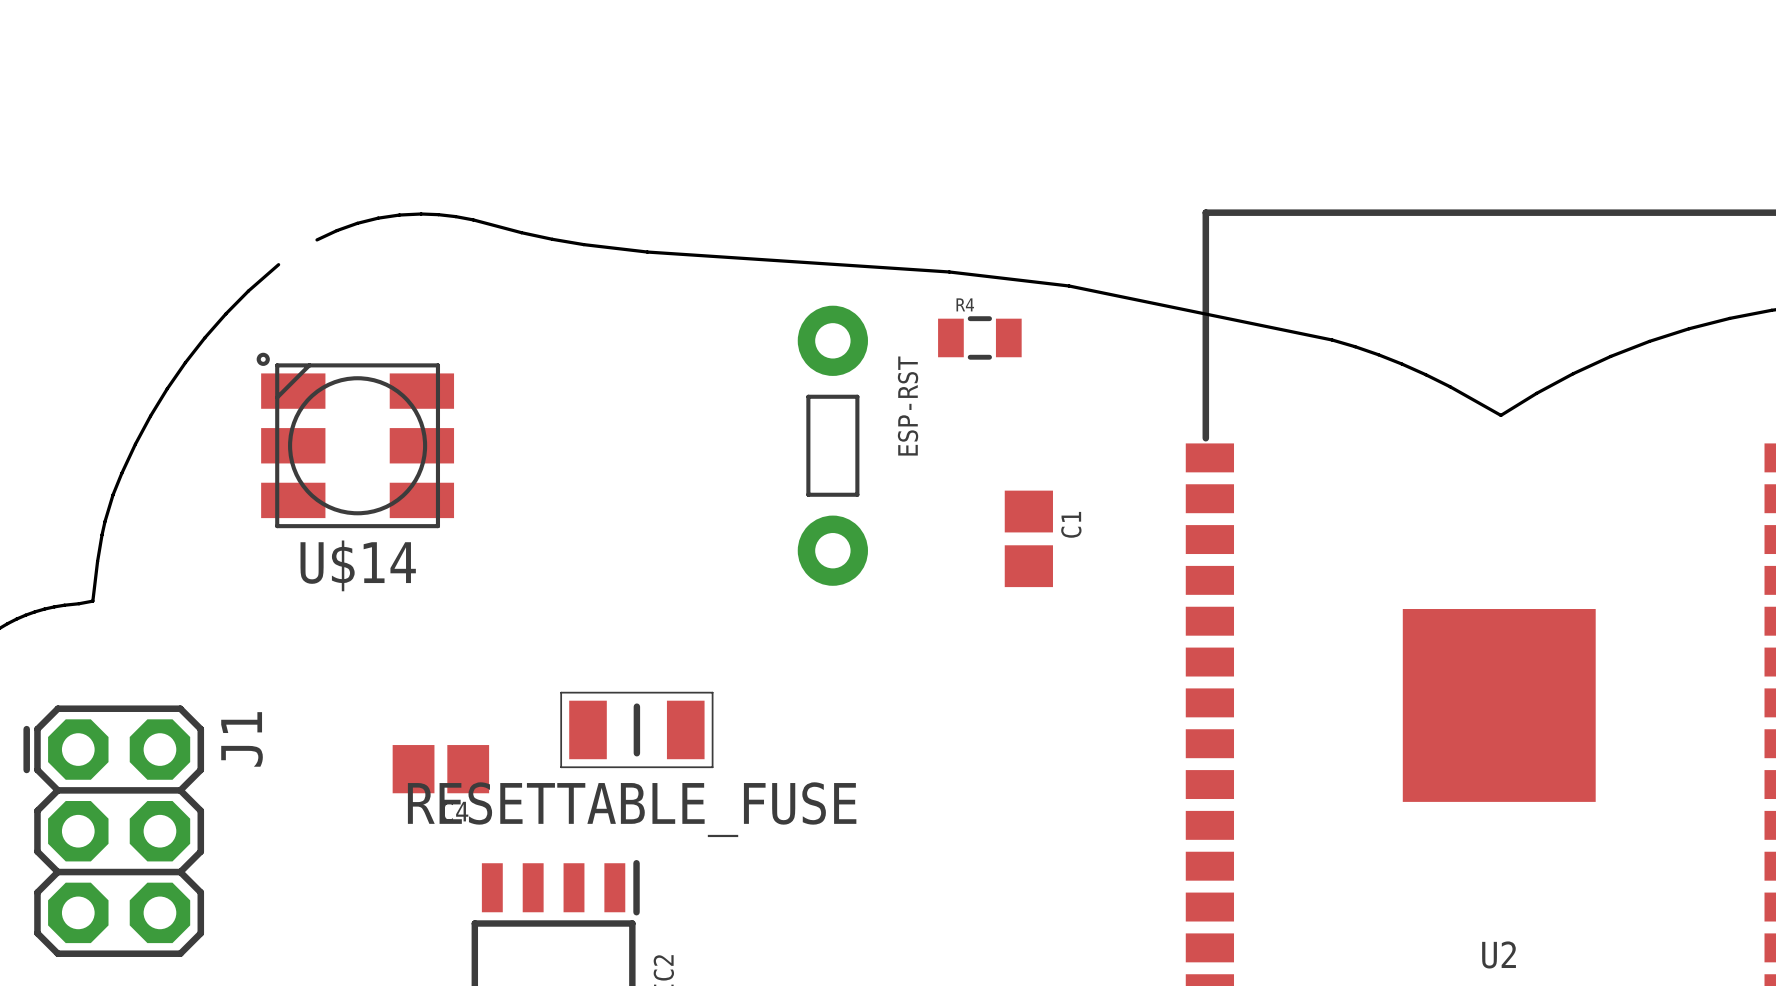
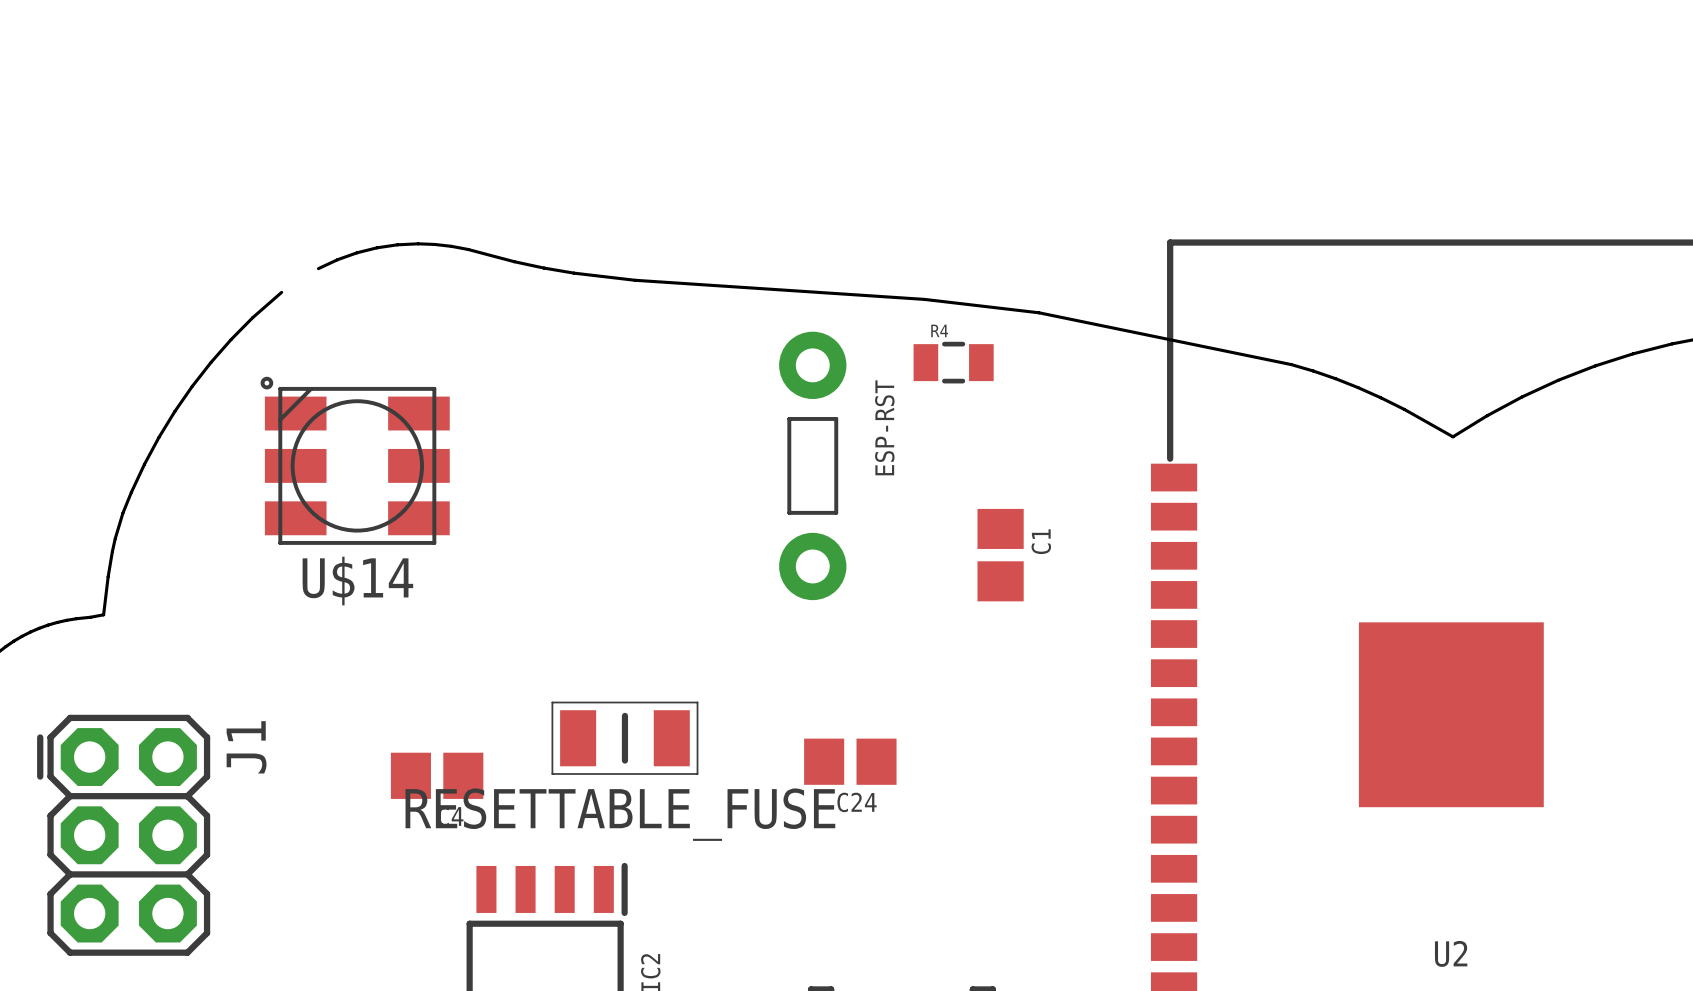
C24: none -> (850, 761)

